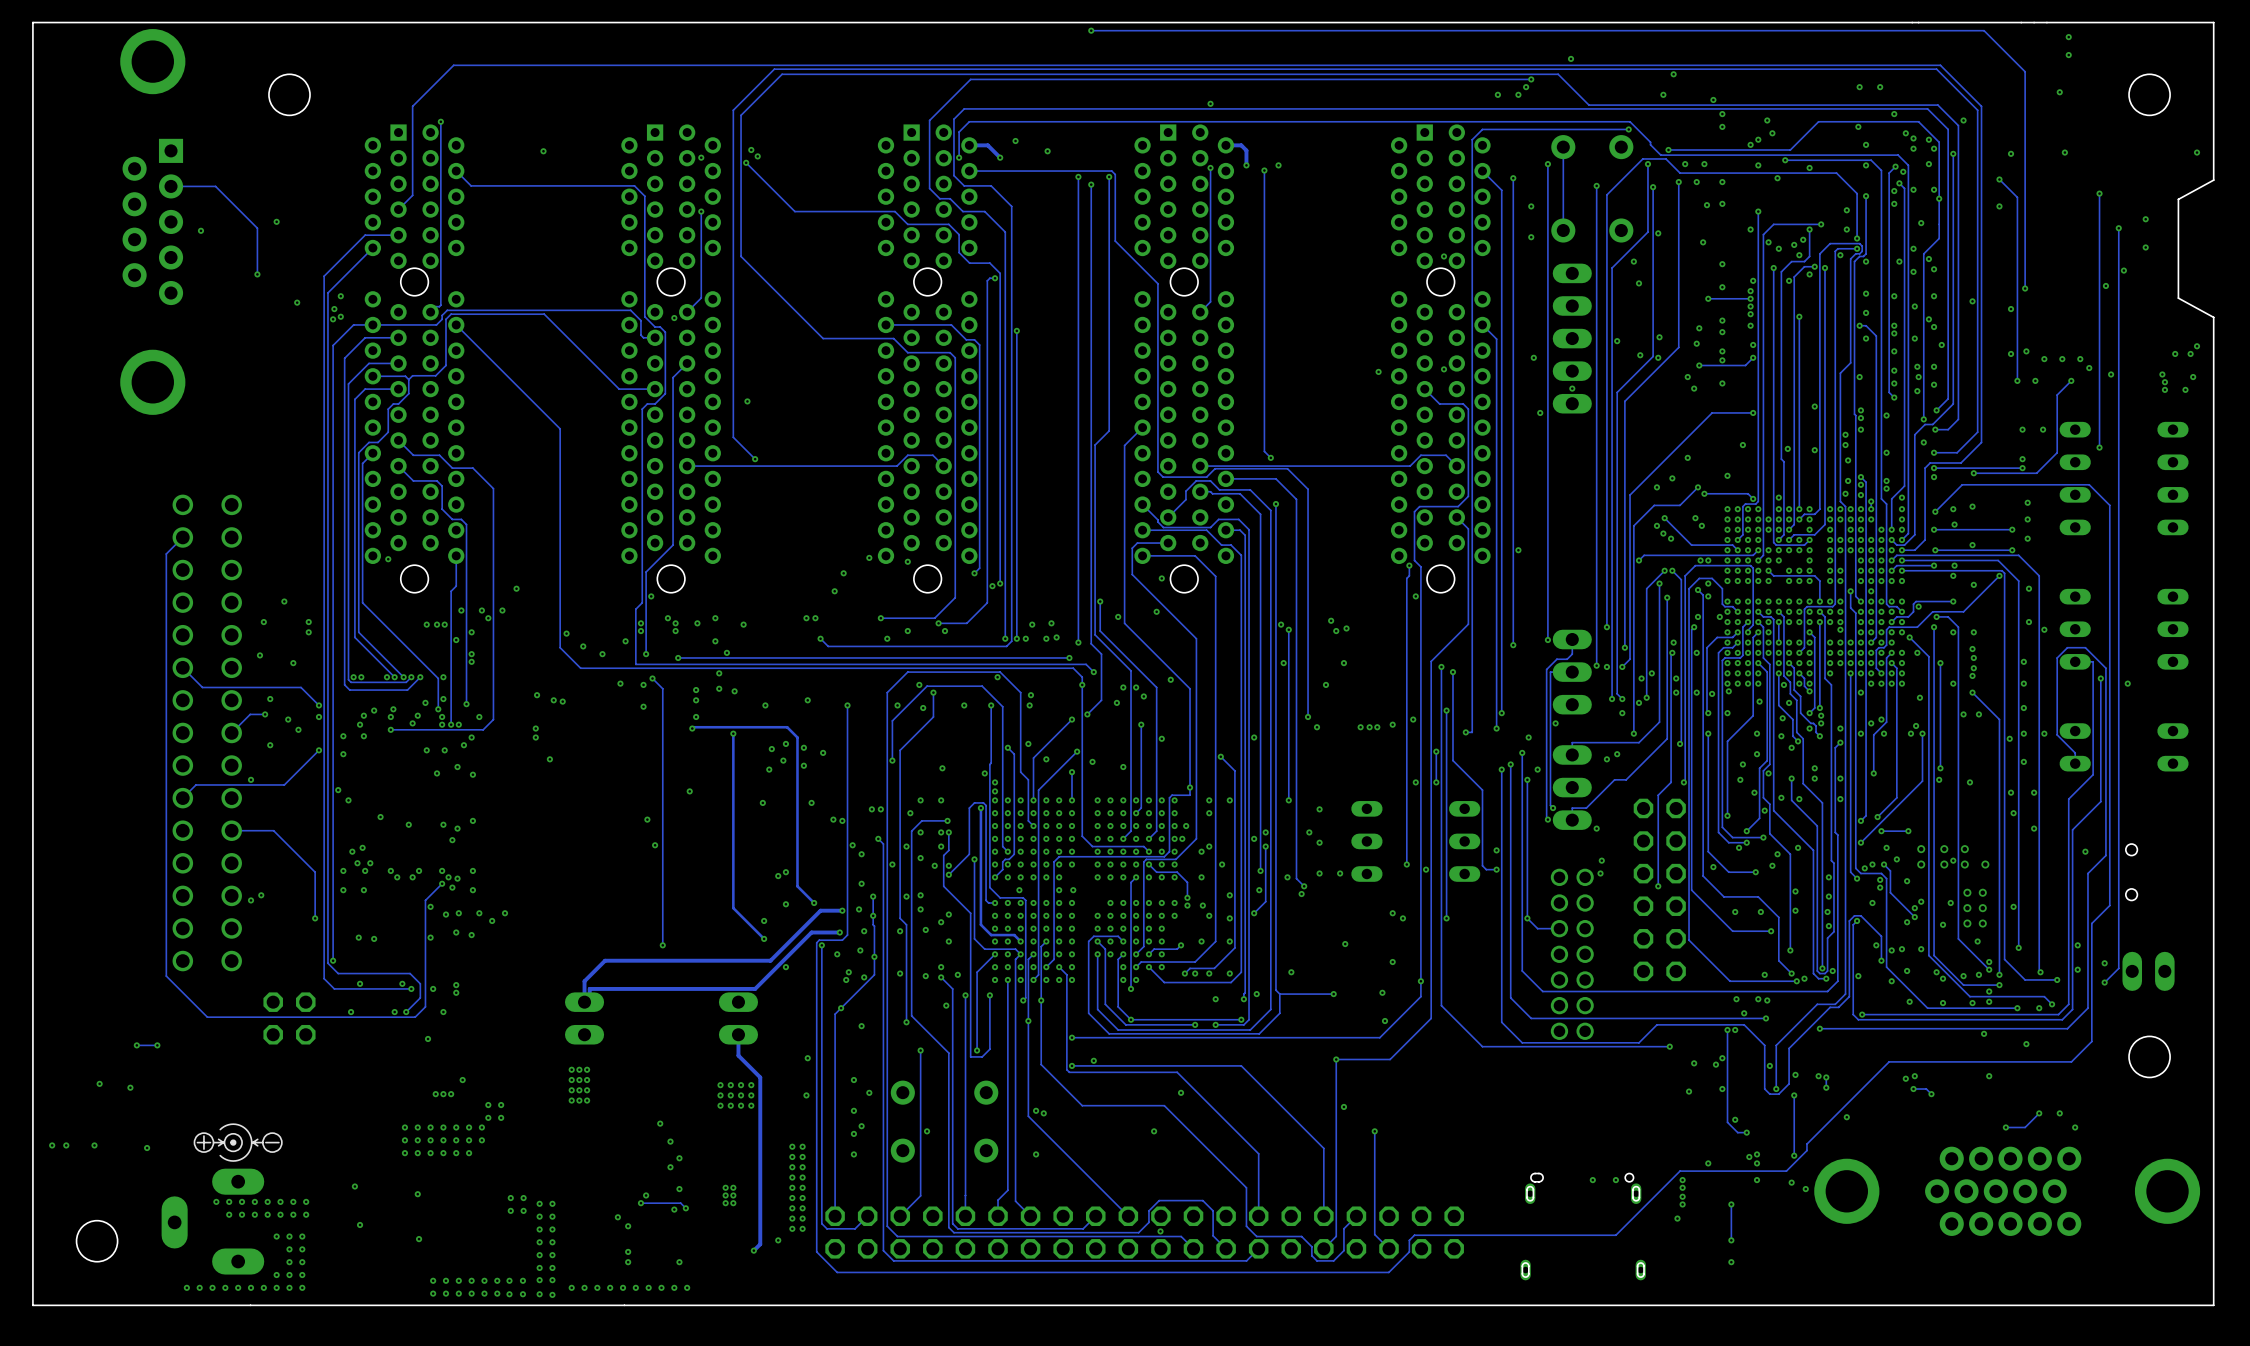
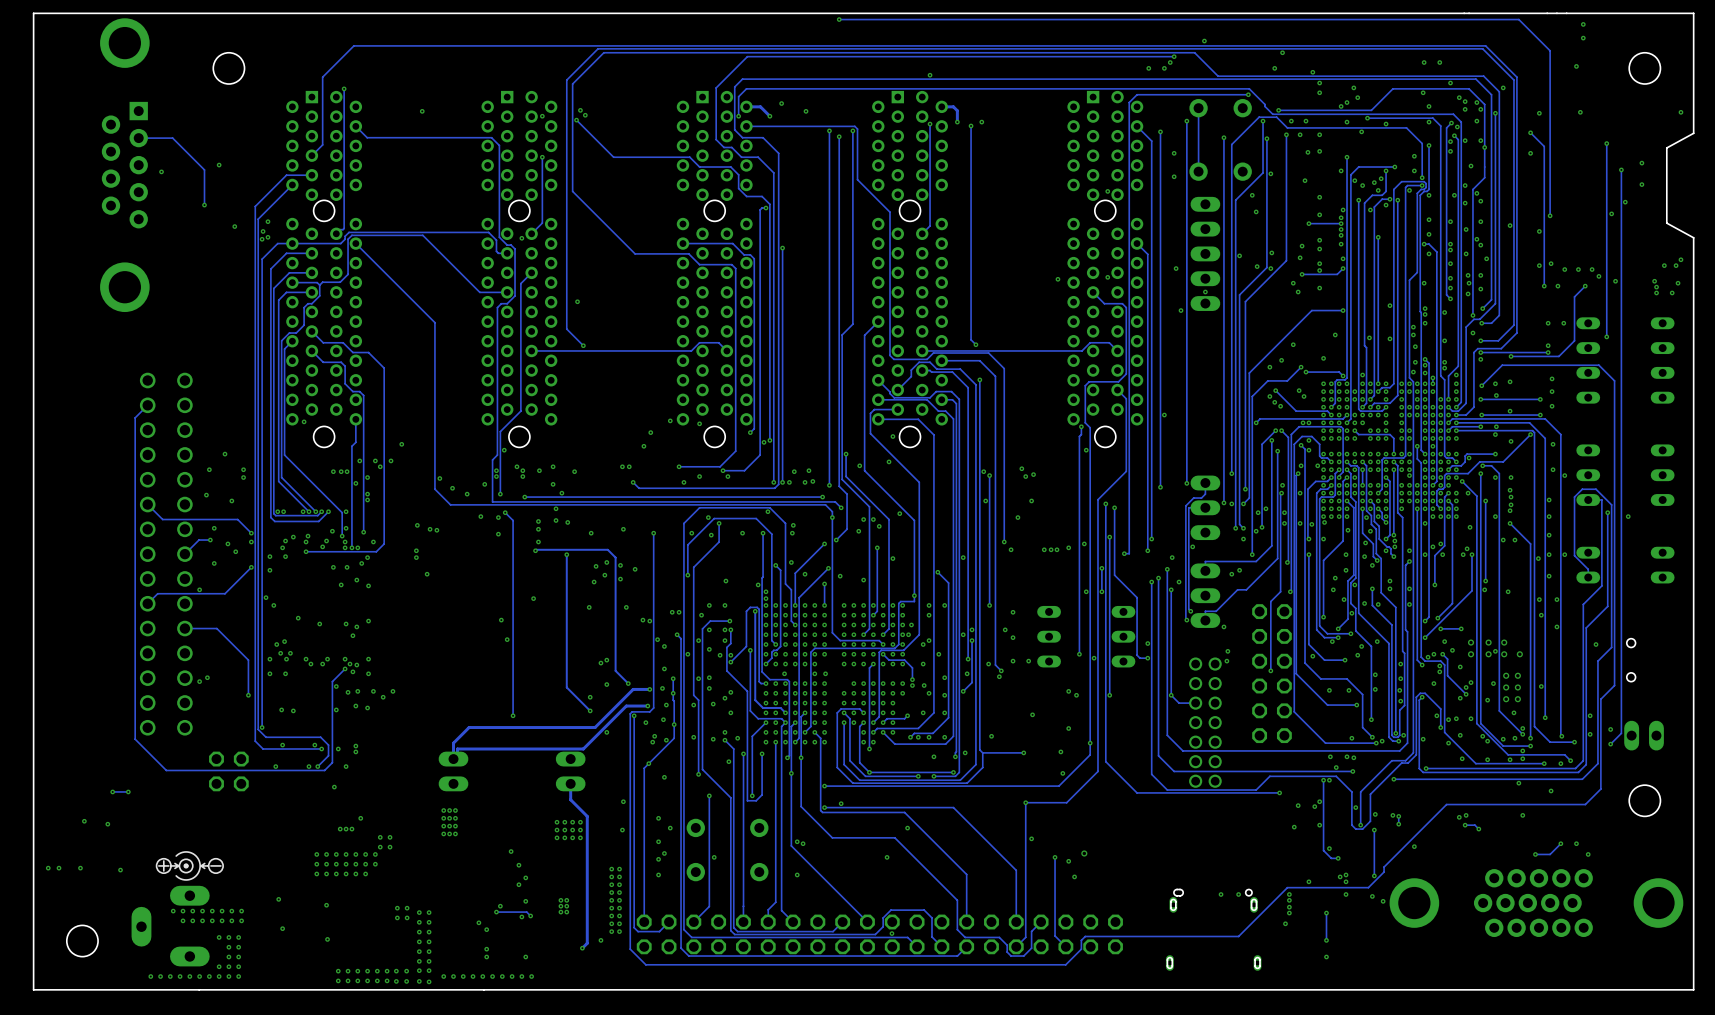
via: none -> (1084, 853)
via: none -> (1068, 861)
via: none -> (1074, 876)

